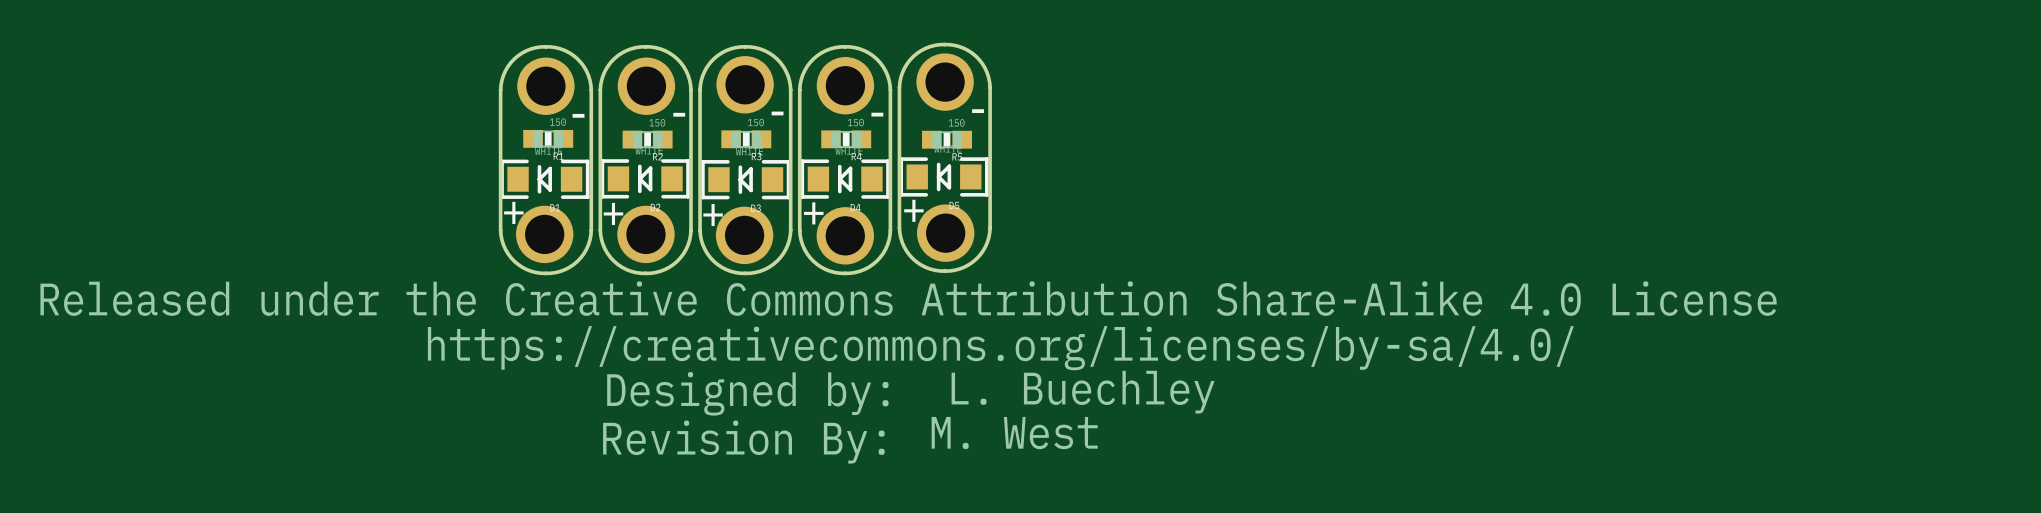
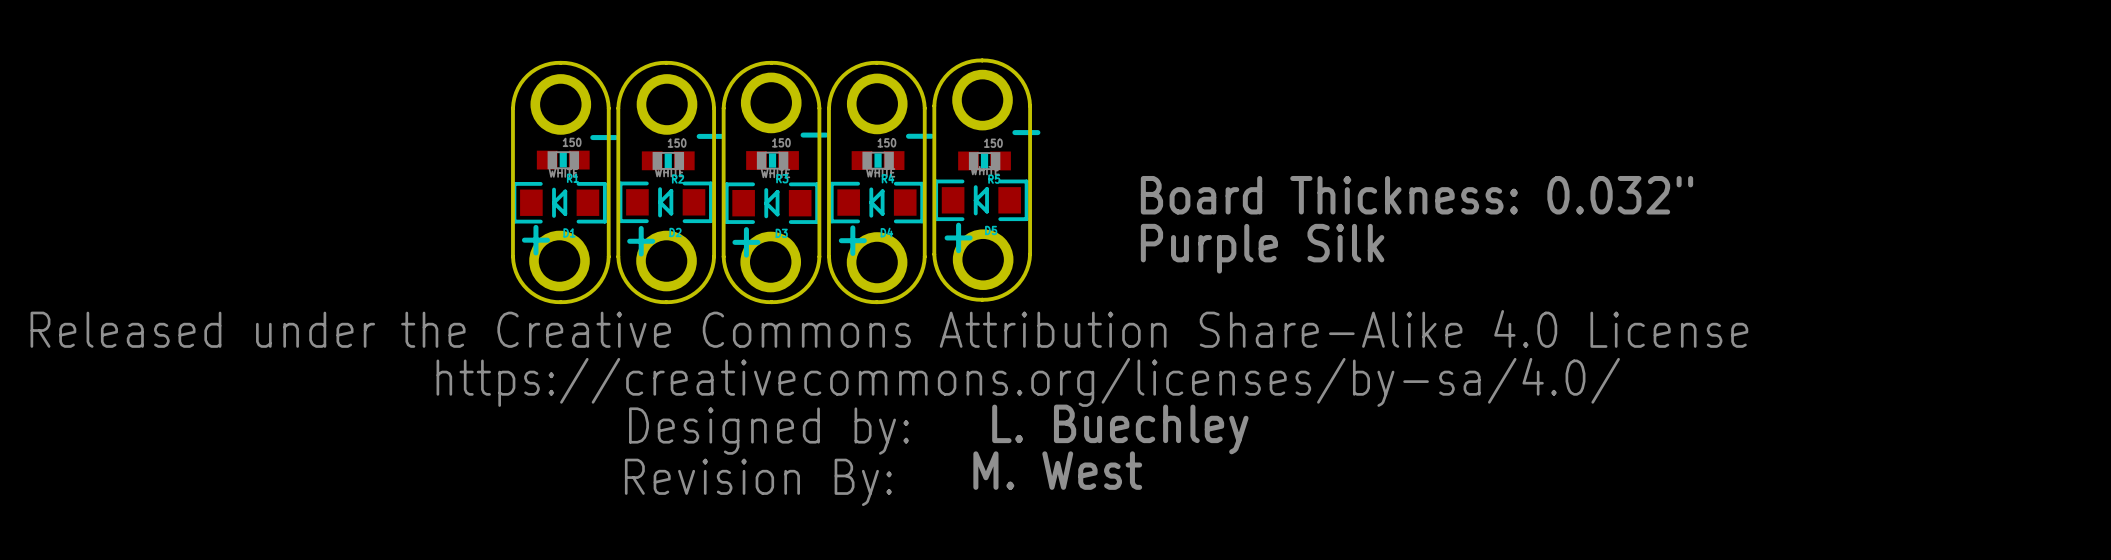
text: none -> Board Thickness: 0.032" (1416, 195)
text: none -> Purple Silk (1262, 248)

